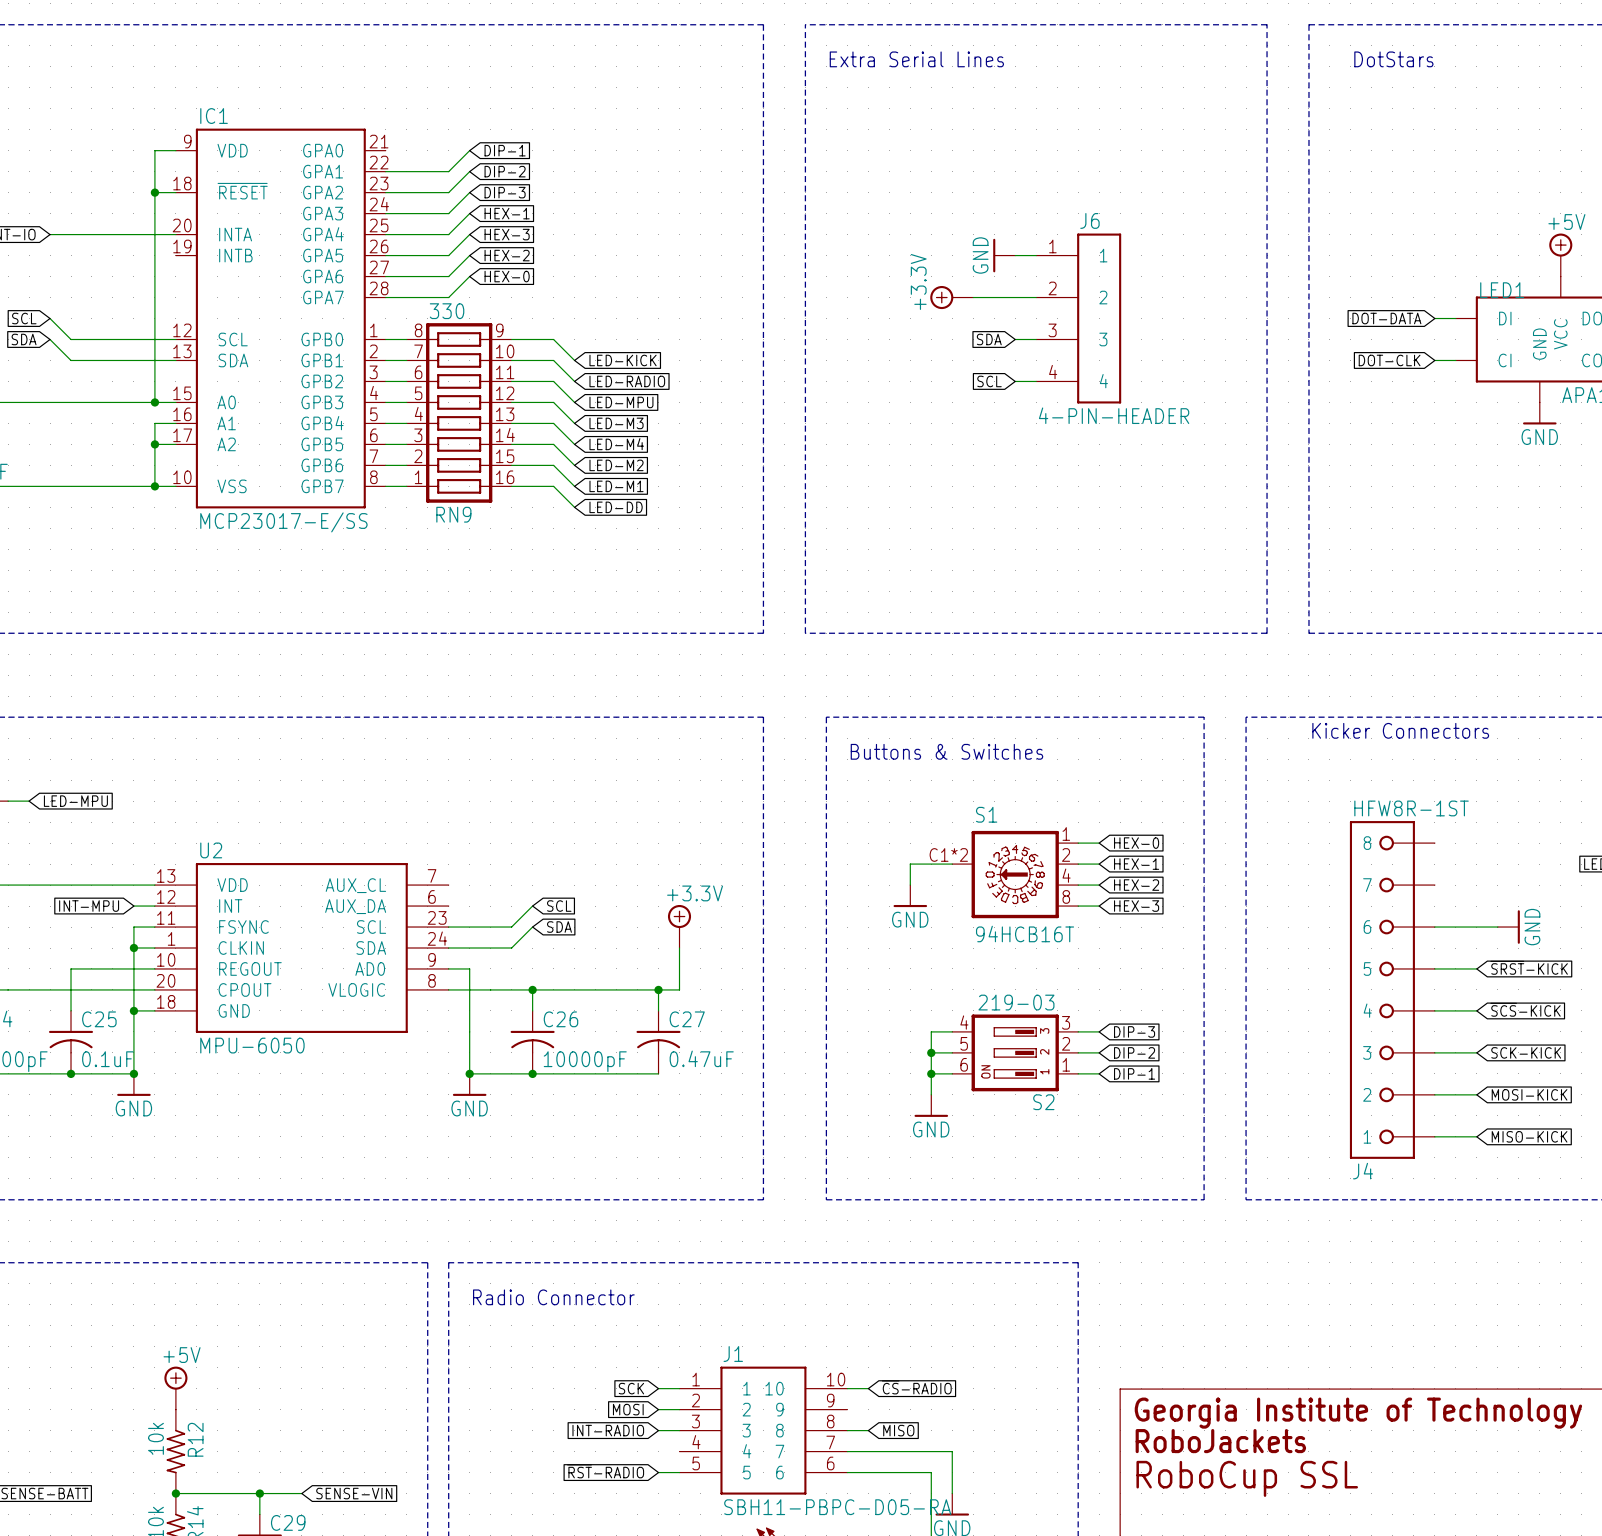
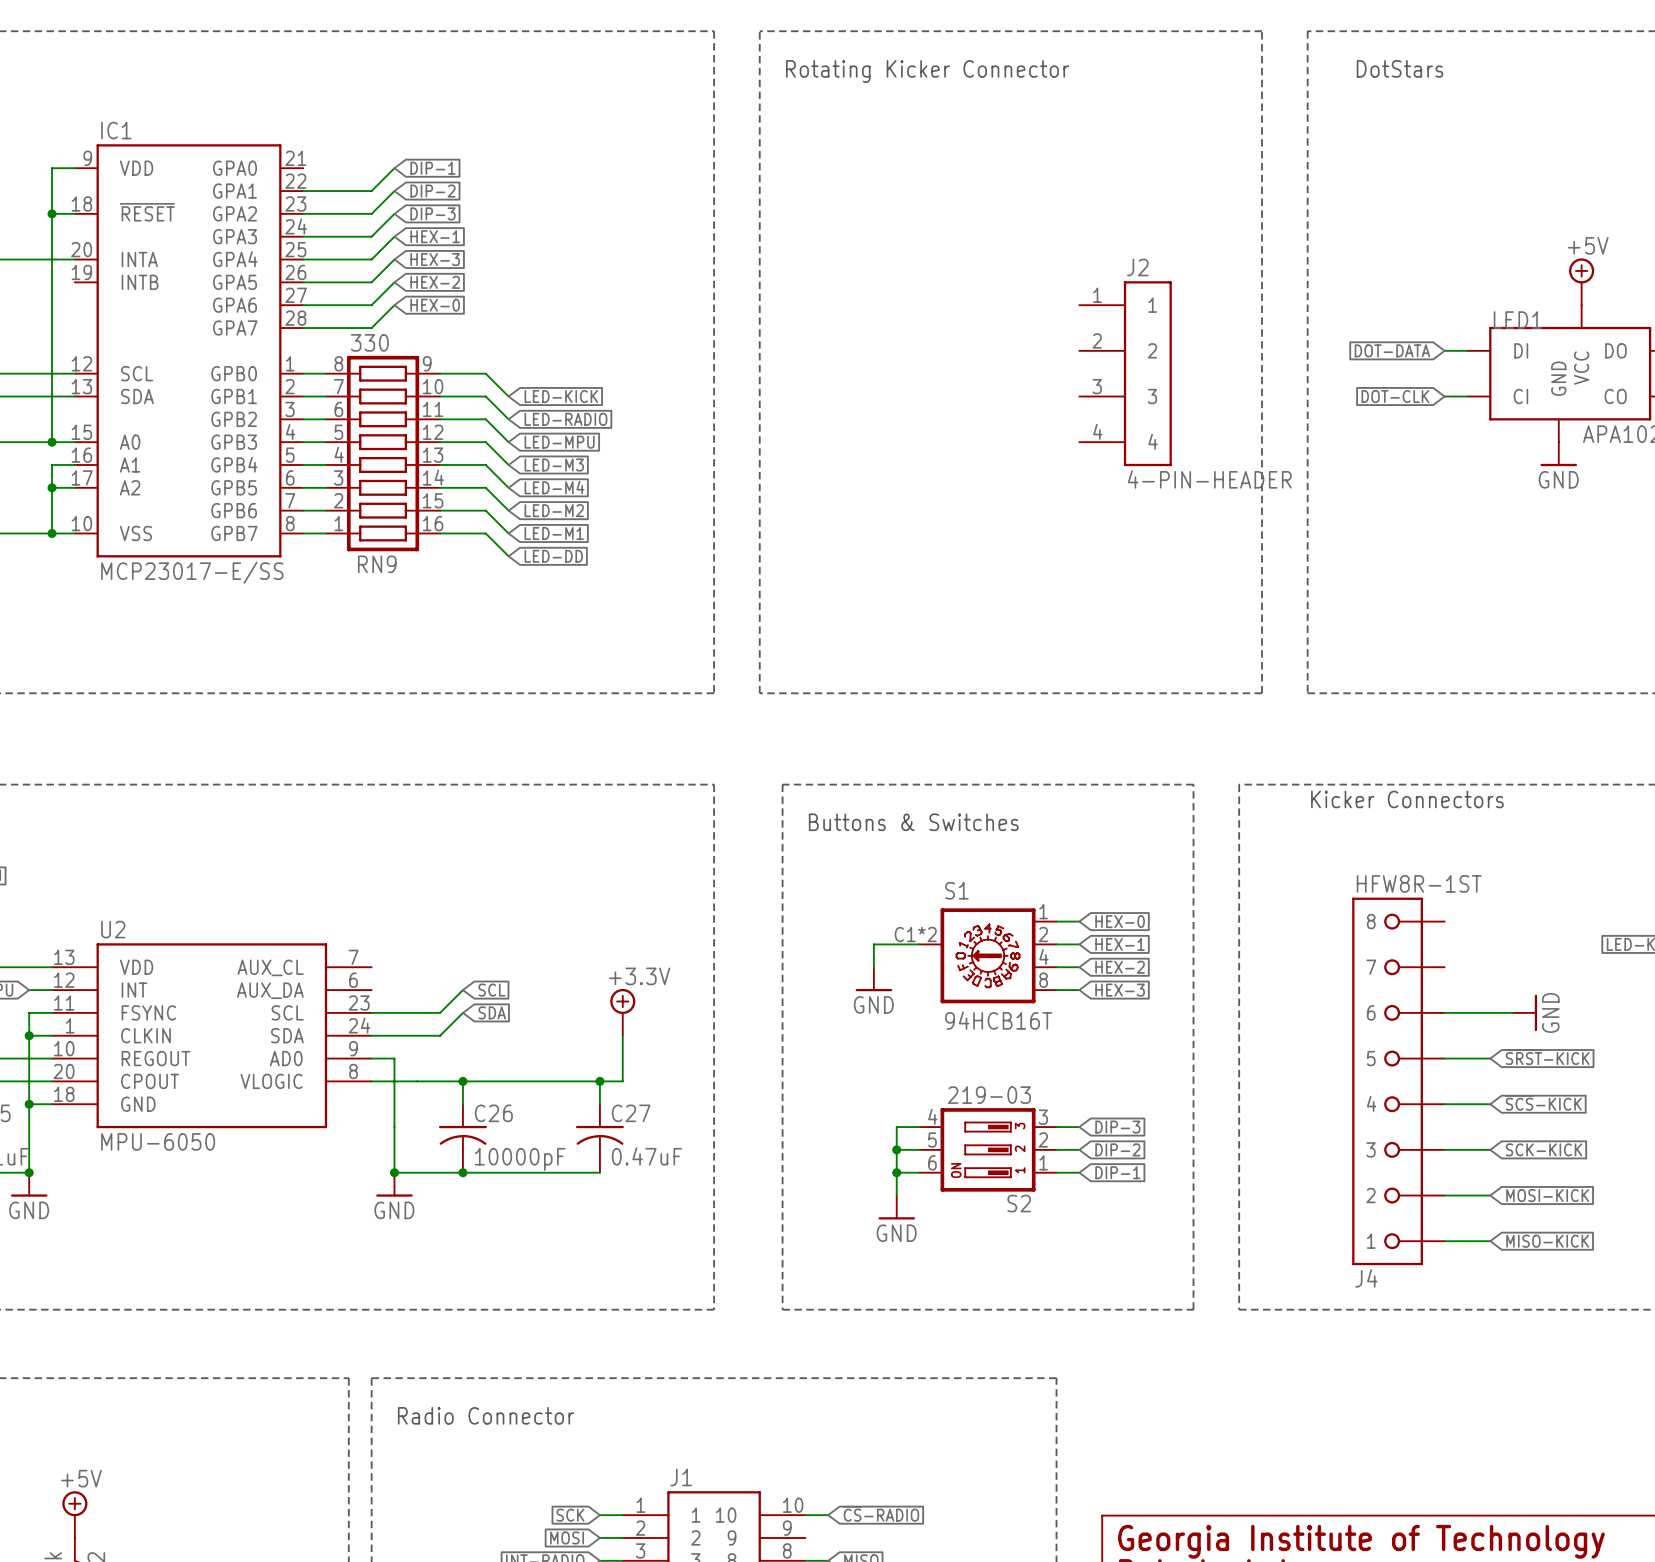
text: Extra Serial Lines (916, 59) -> Rotating Kicker Connector (927, 71)
power symbol: GND (1004, 255) -> none
wire: (1015, 255) (1036, 255) -> none
power symbol: +3.3V (951, 297) -> none
wire: (973, 297) (1036, 297) -> none
J6: 4-PIN-HEADER (1078, 318) -> none
global label: SDA (989, 339) -> none
wire: (1015, 339) (1036, 339) -> none
J2: none -> 4-PIN-HEADER (1125, 373)
global label: SCL (989, 381) -> none
wire: (1015, 381) (1036, 381) -> none

